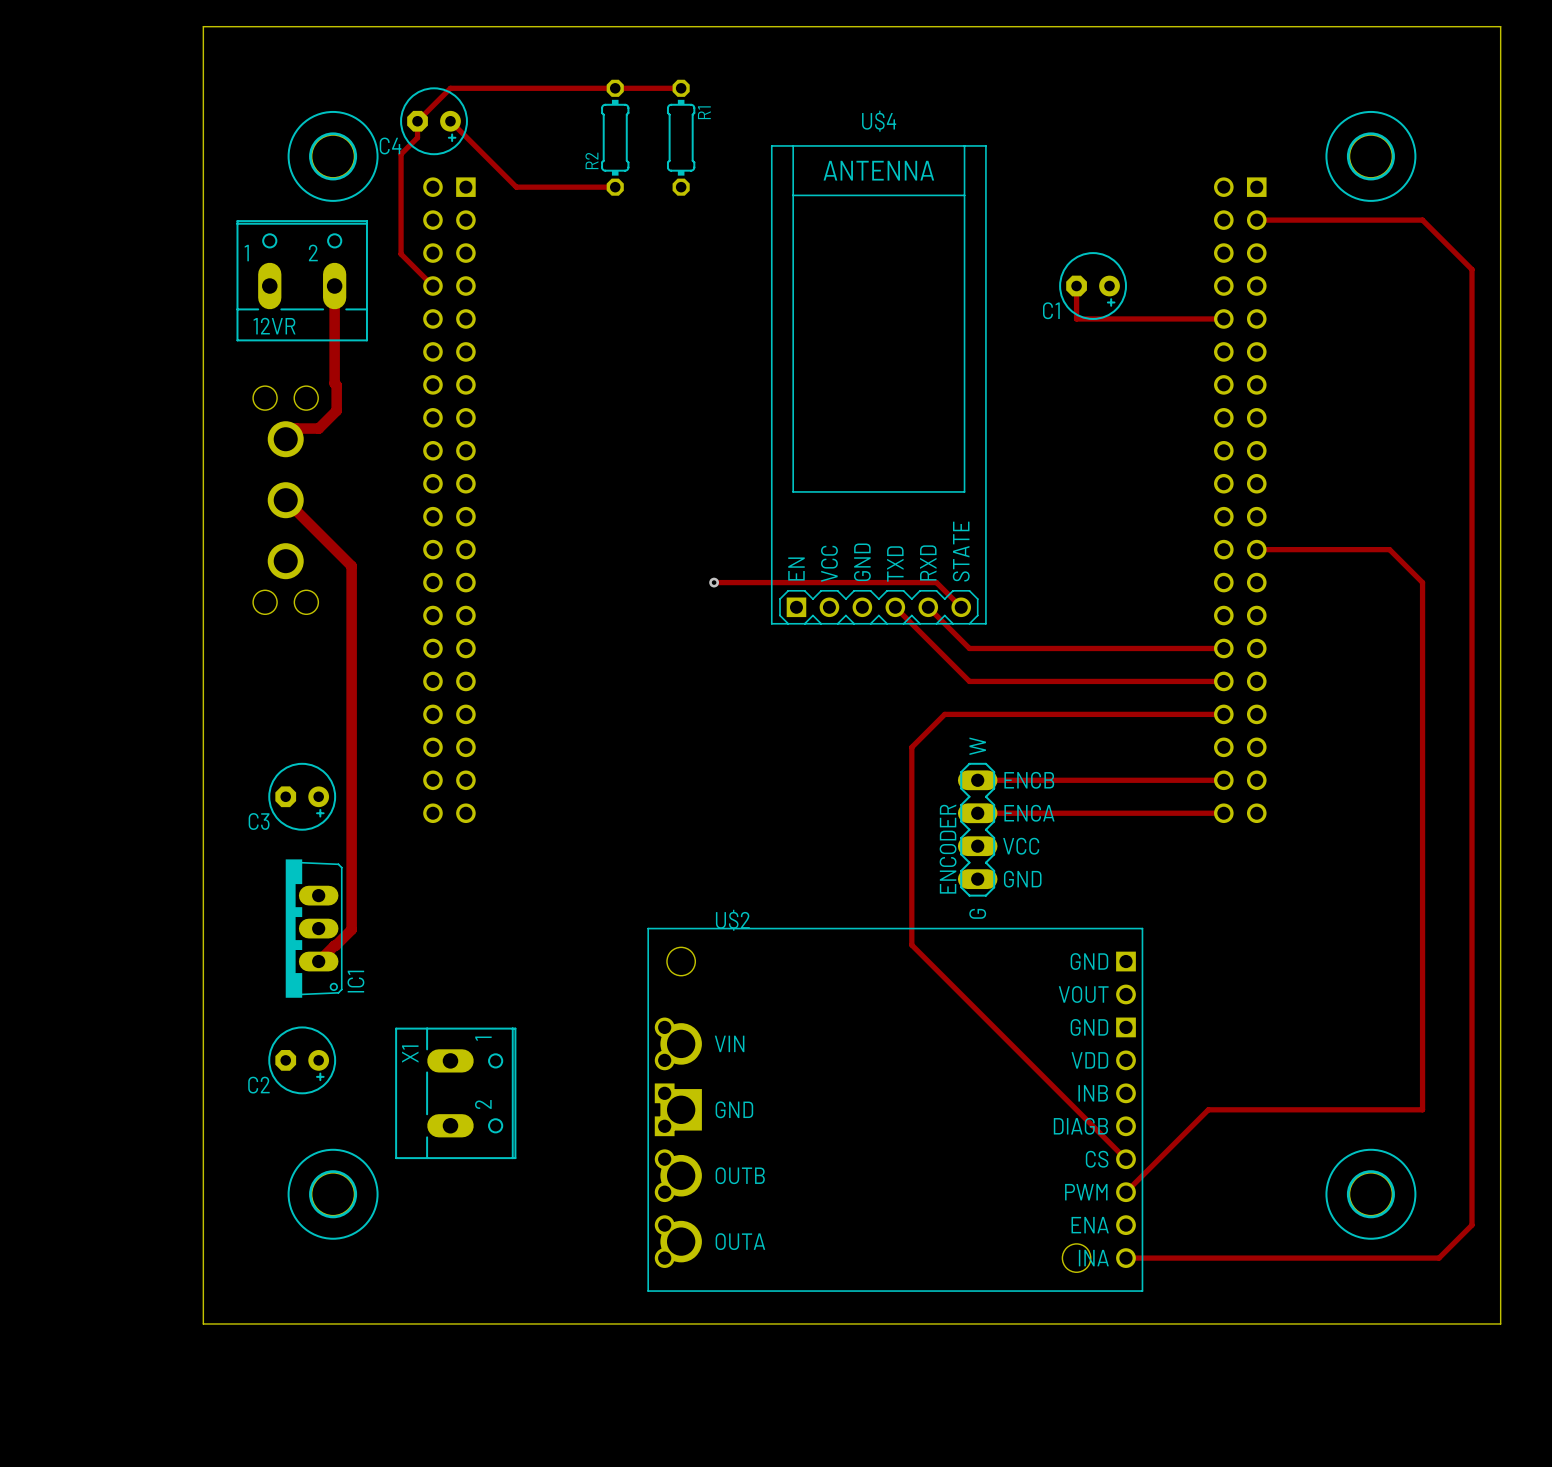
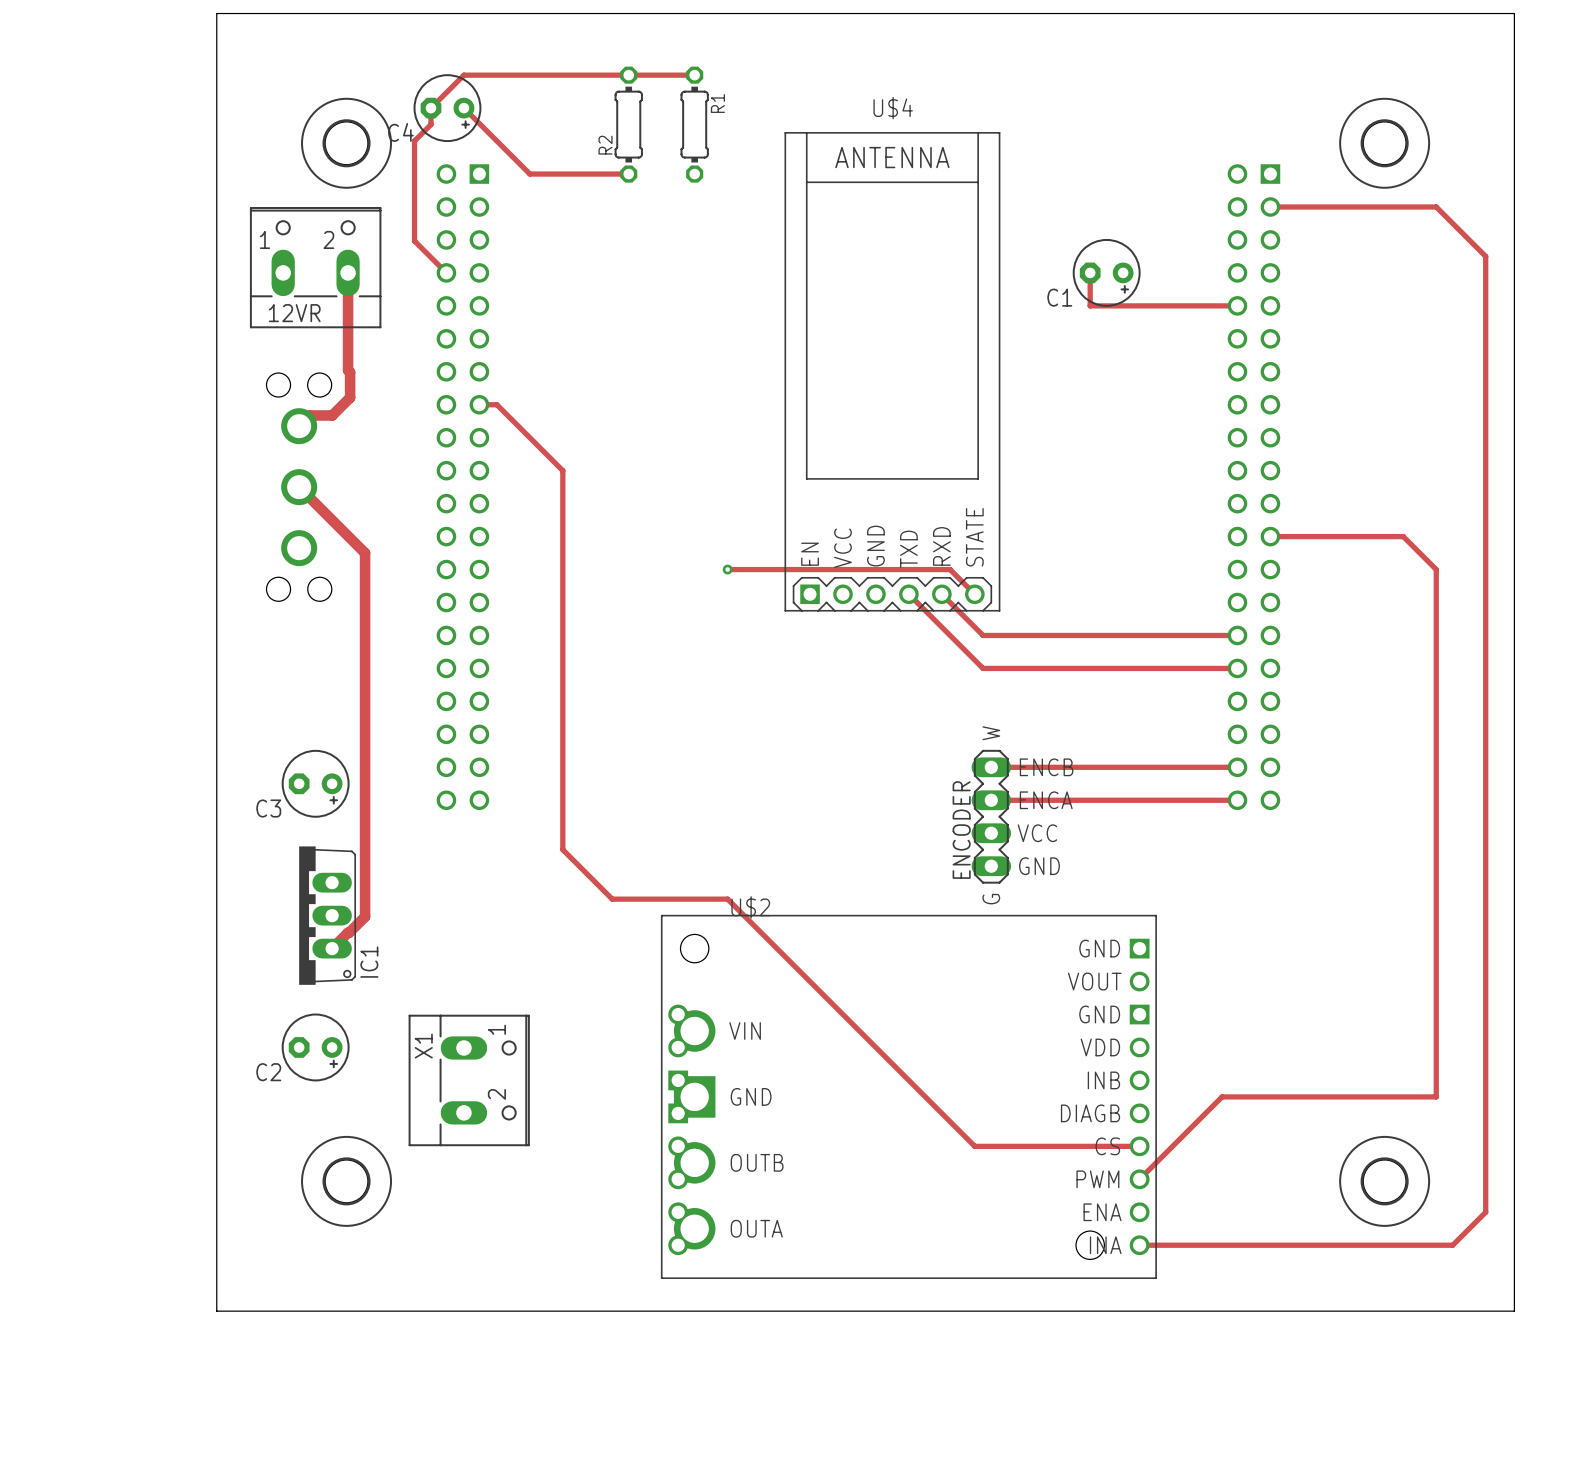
track: (1223, 714) (944, 714) (911, 747) (911, 945) (1125, 1159) -> (479, 404) (496, 404) (562, 470) (562, 849) (612, 899) (727, 899) (974, 1146) (1139, 1146)

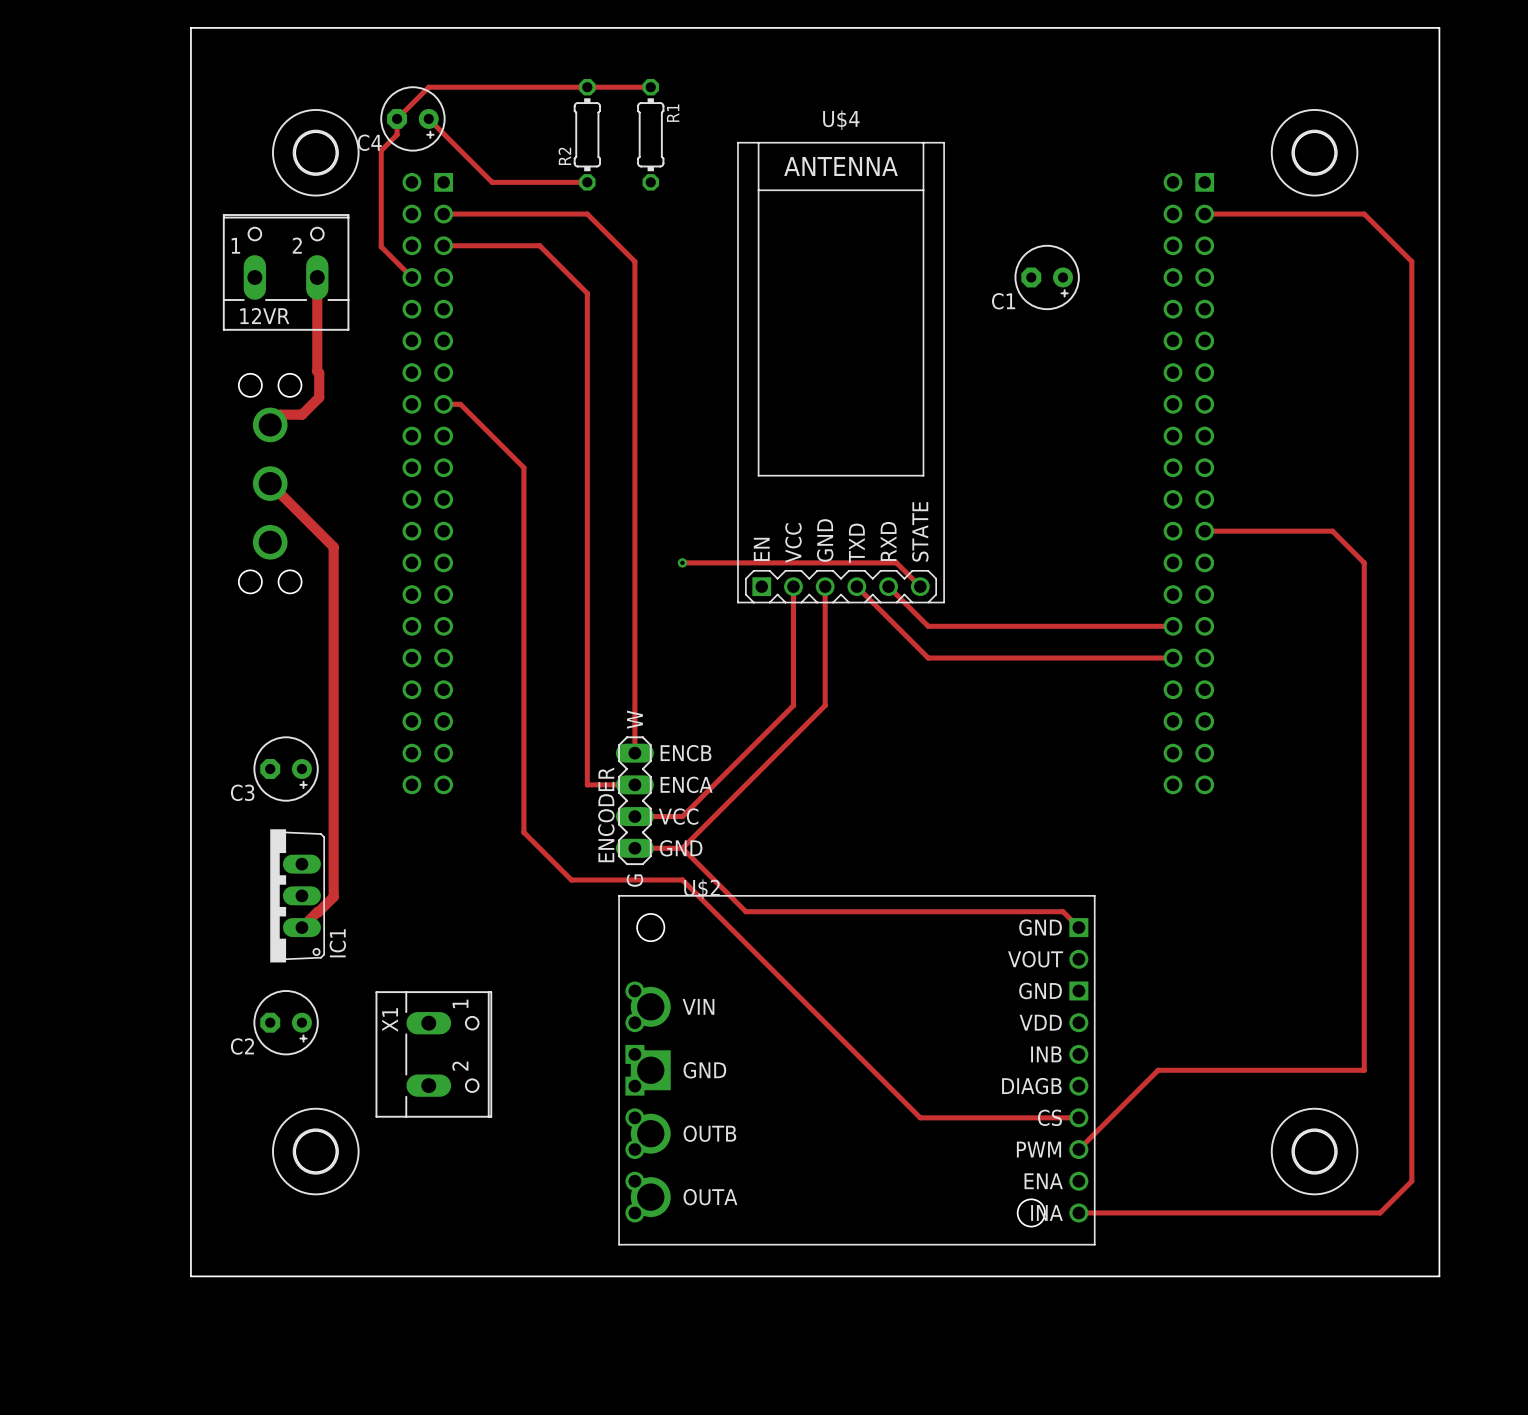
track: none -> (443, 214) (587, 214) (634, 261) (634, 753)
track: none -> (443, 245) (539, 245) (587, 293) (587, 784) (634, 784)
track: (1090, 272) (1090, 305) (1237, 305) -> none
track: none -> (793, 586) (793, 705) (682, 816) (634, 816)
track: none -> (825, 586) (825, 705) (682, 848)
track: (991, 767) (1237, 767) -> none
track: (991, 800) (1237, 800) -> none
ENCODER position: (991, 816) -> (634, 800)
track: none -> (634, 848) (682, 848)
track: none -> (682, 848) (745, 911) (1063, 911) (1078, 927)

